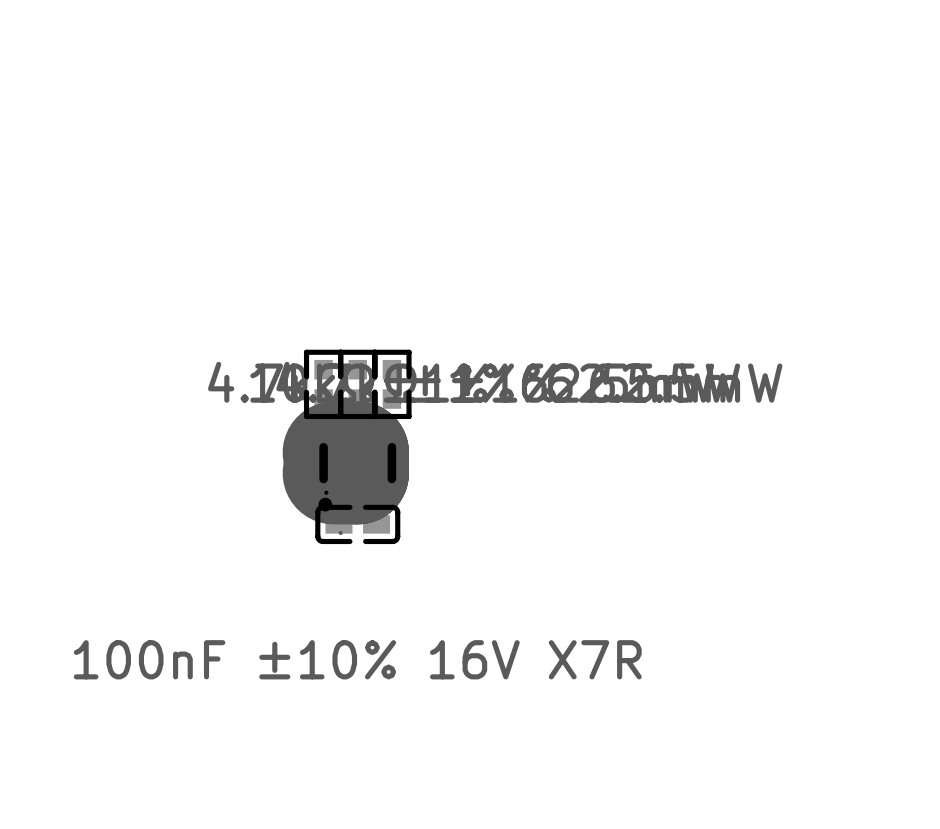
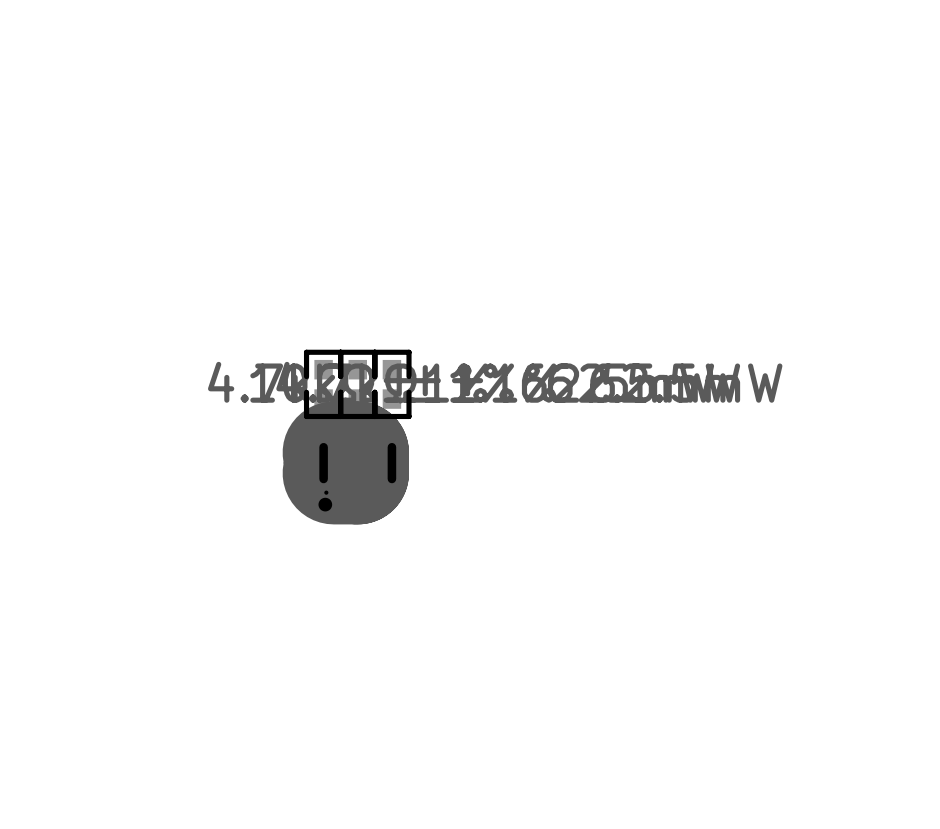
part: 100nF ±10% 16V X7R (357, 524) -> none

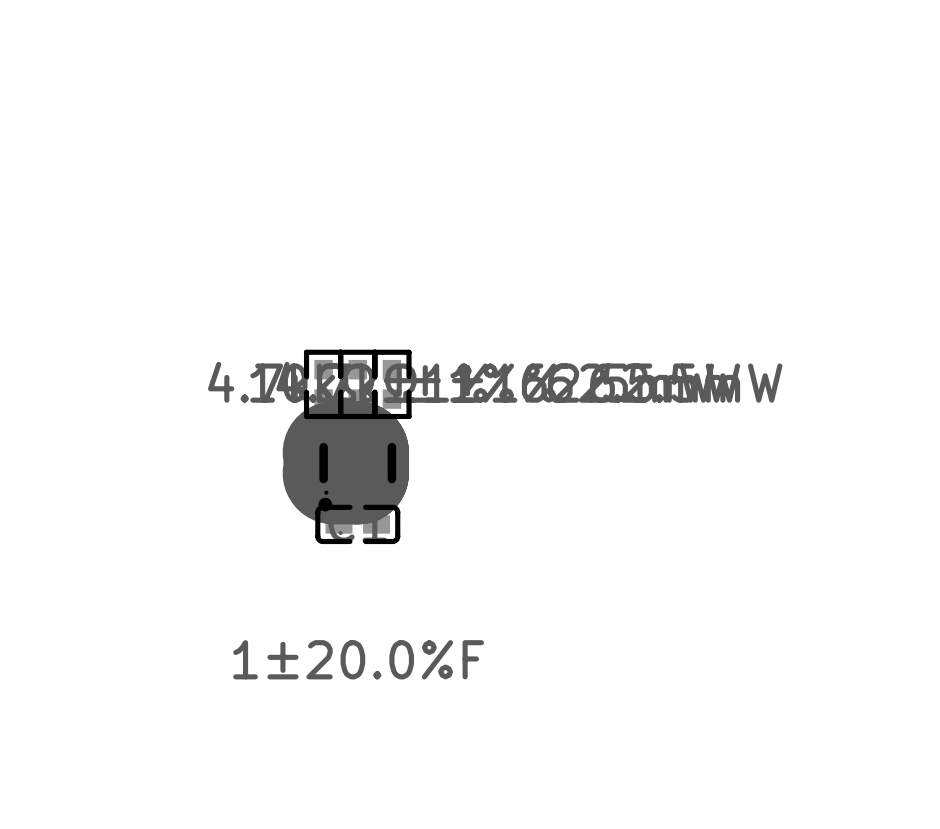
part: none -> 1±20.0%F (357, 524)

